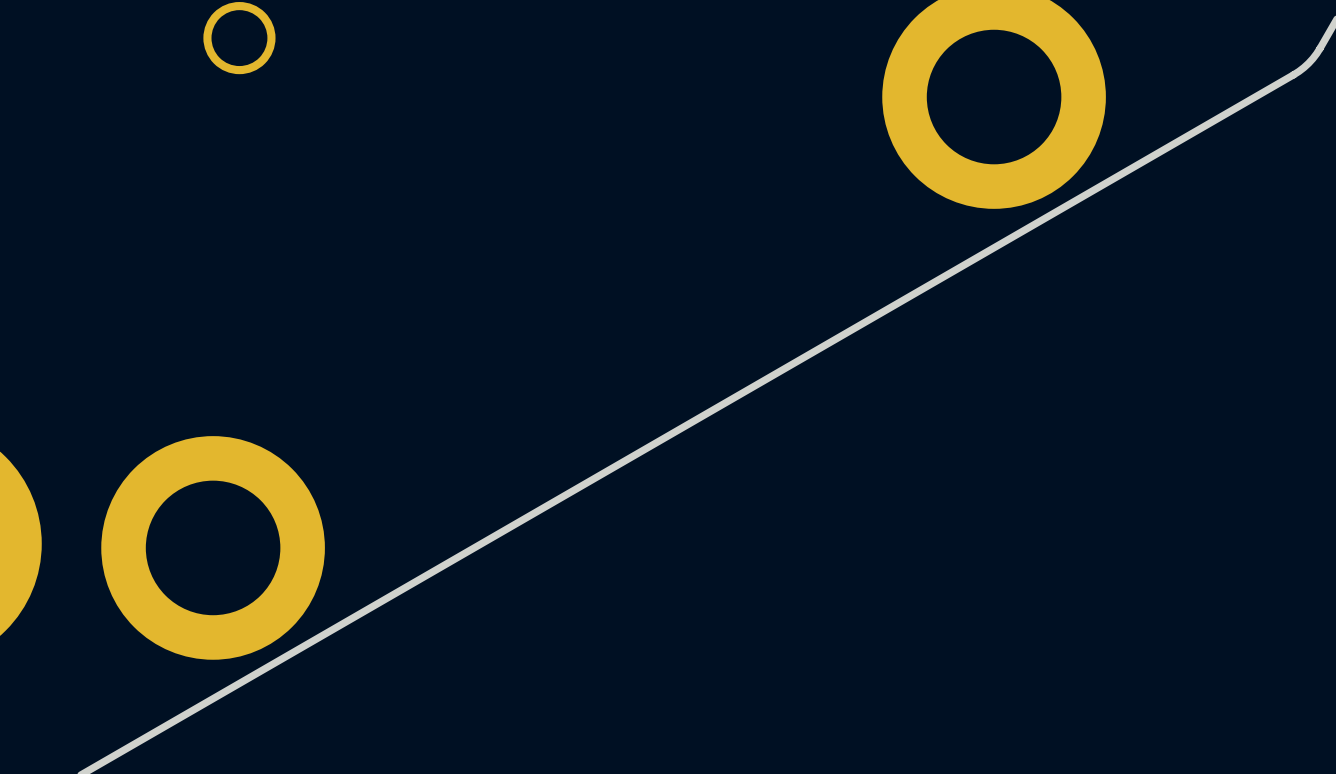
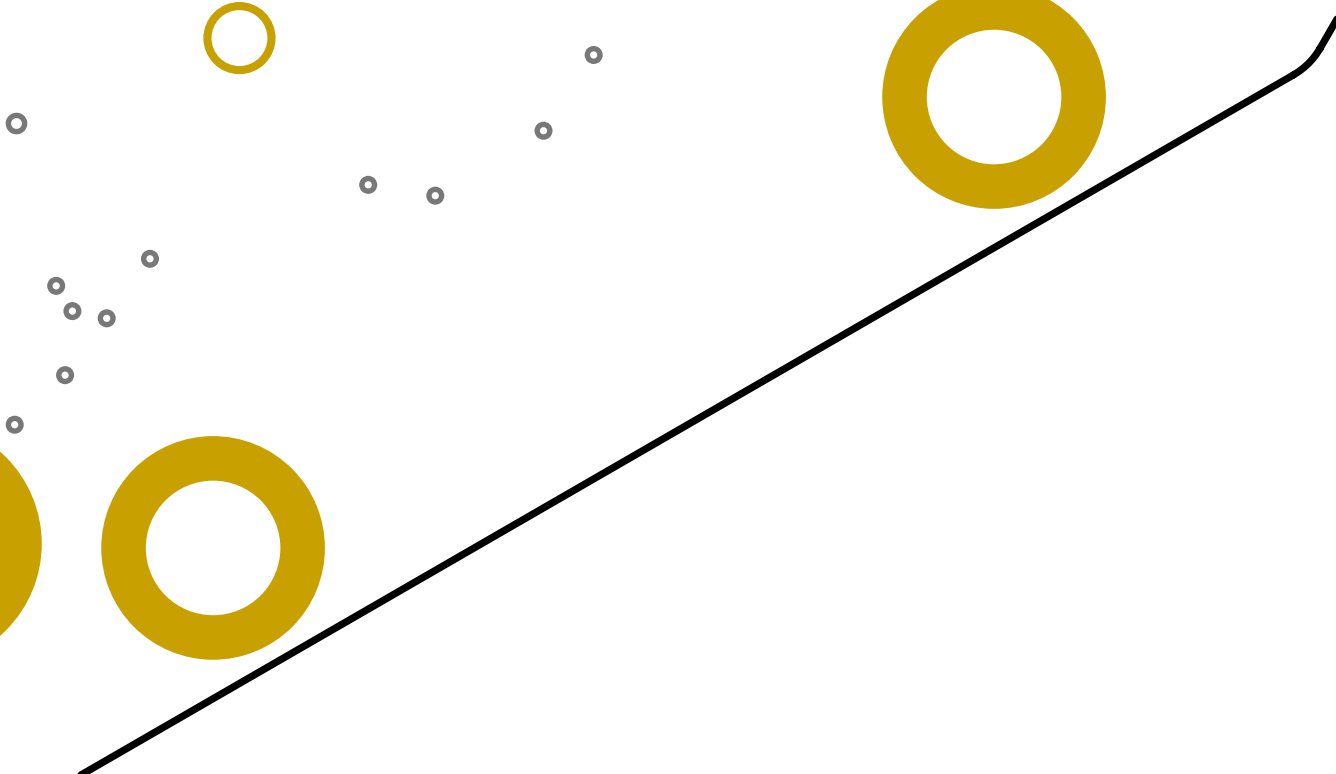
via: none -> (593, 54)
via: none -> (16, 123)
via: none -> (543, 130)
via: none -> (368, 184)
via: none -> (435, 195)
via: none -> (149, 258)
via: none -> (56, 285)
via: none -> (72, 311)
via: none -> (106, 318)
via: none -> (65, 375)
via: none -> (14, 424)

